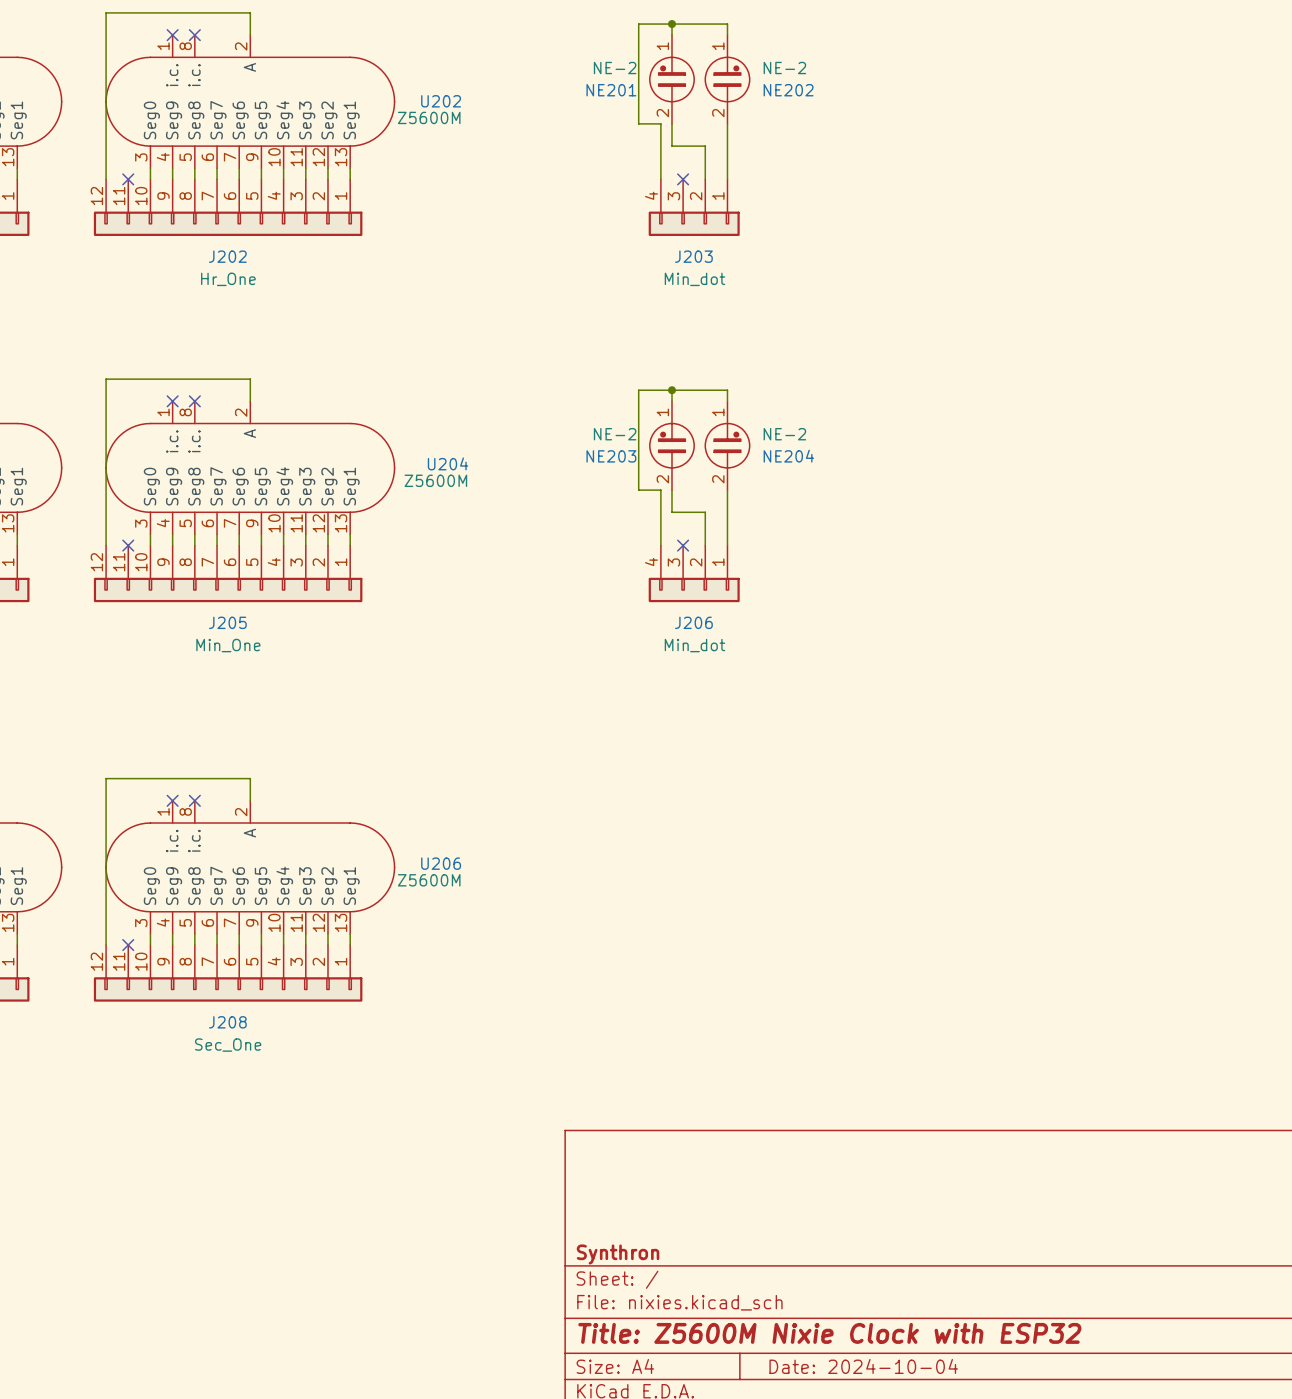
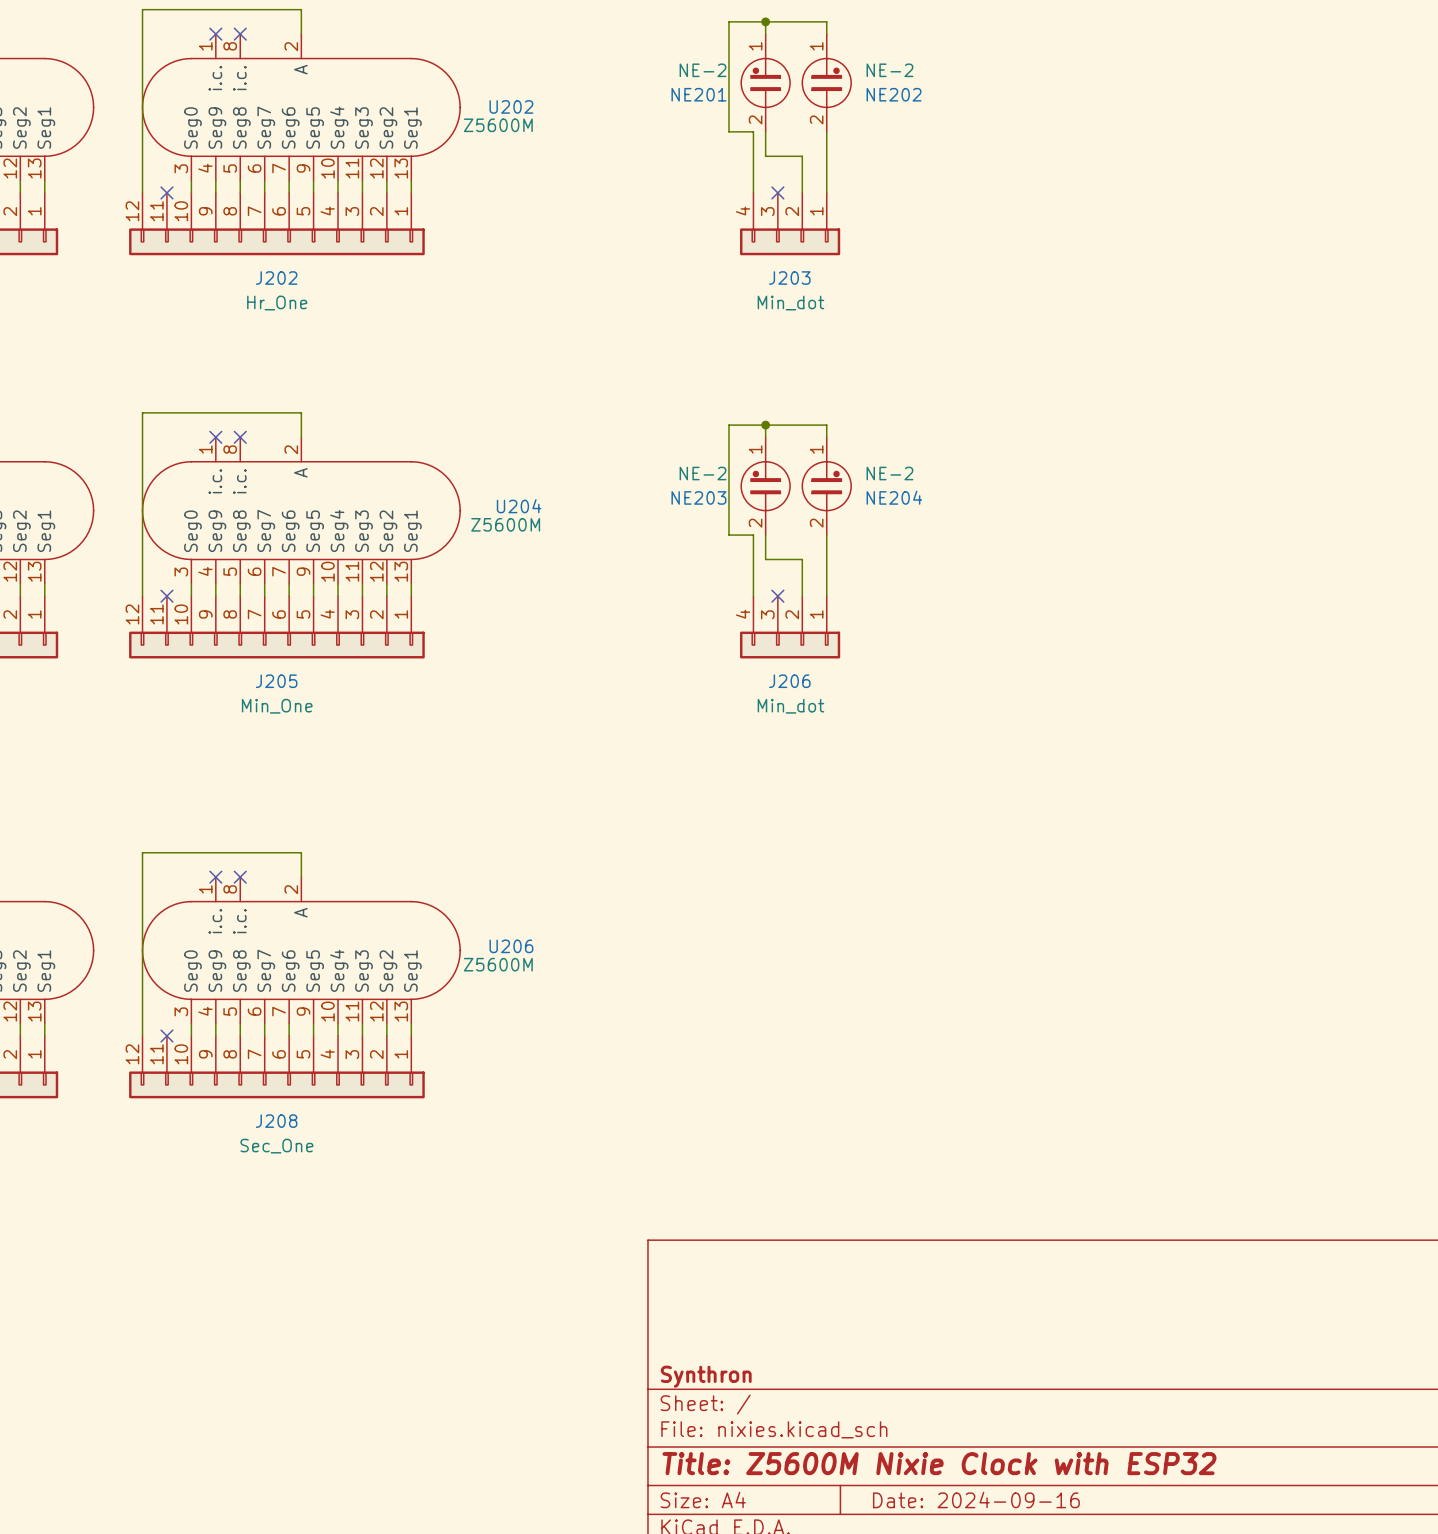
title block: Date: 2024-10-04 (863, 1366) -> Date: 2024-09-16 (976, 1500)

